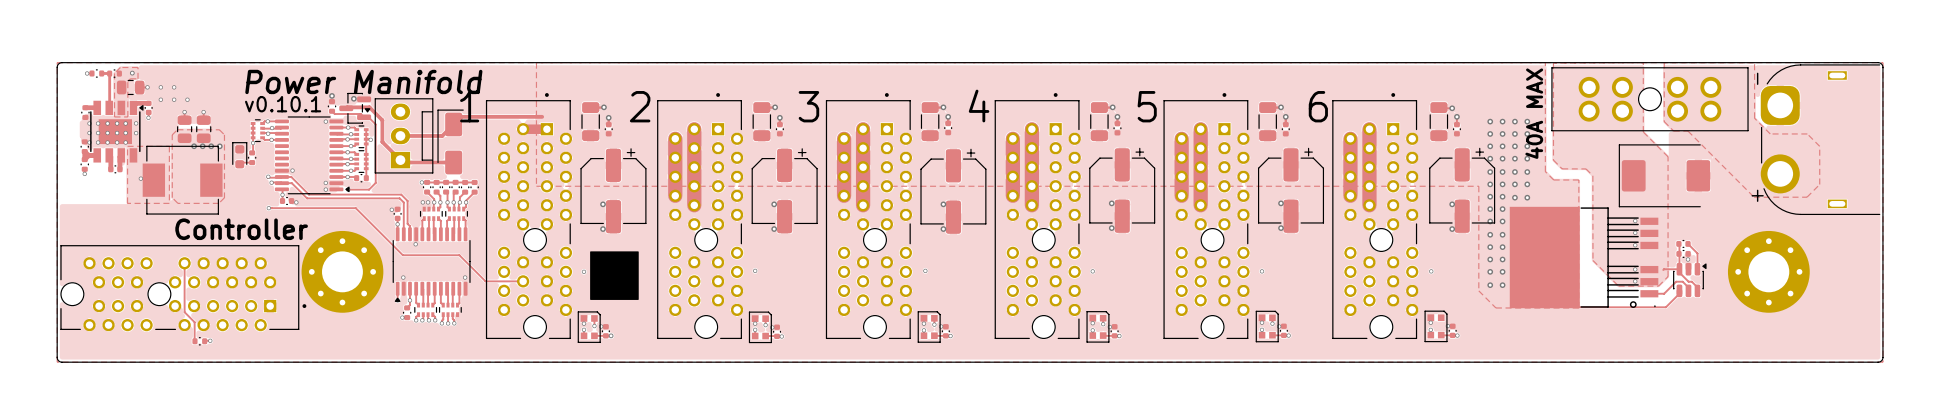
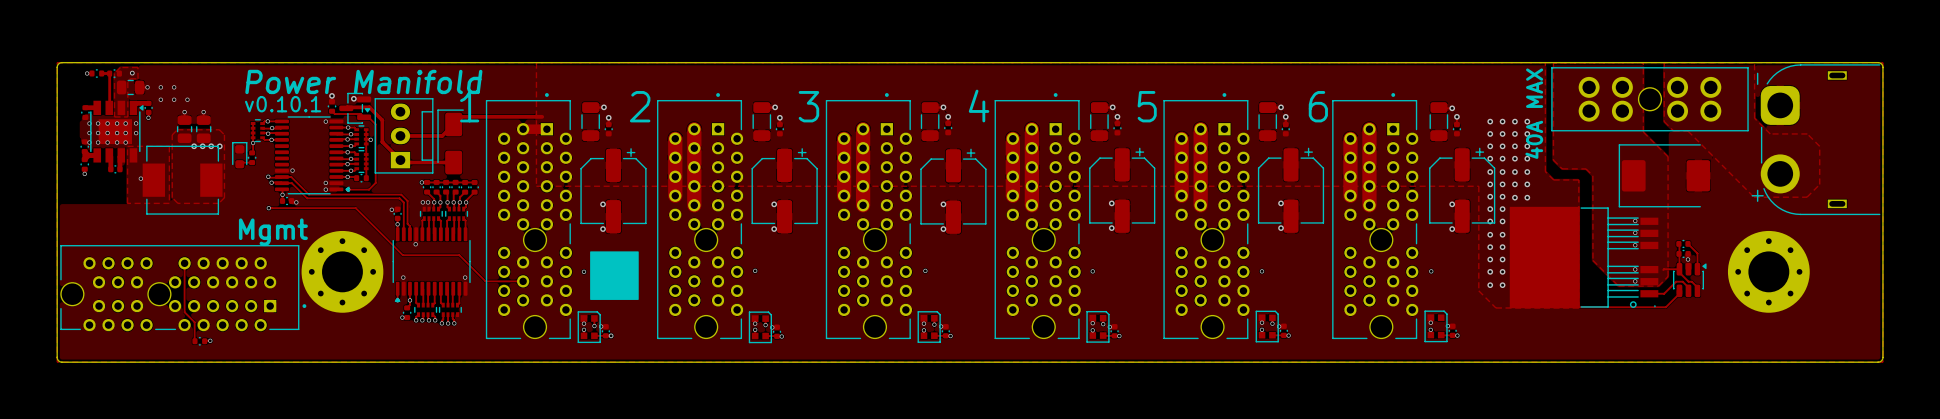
text: Controller (241, 229) -> none
text: none -> Mgmt (273, 232)

